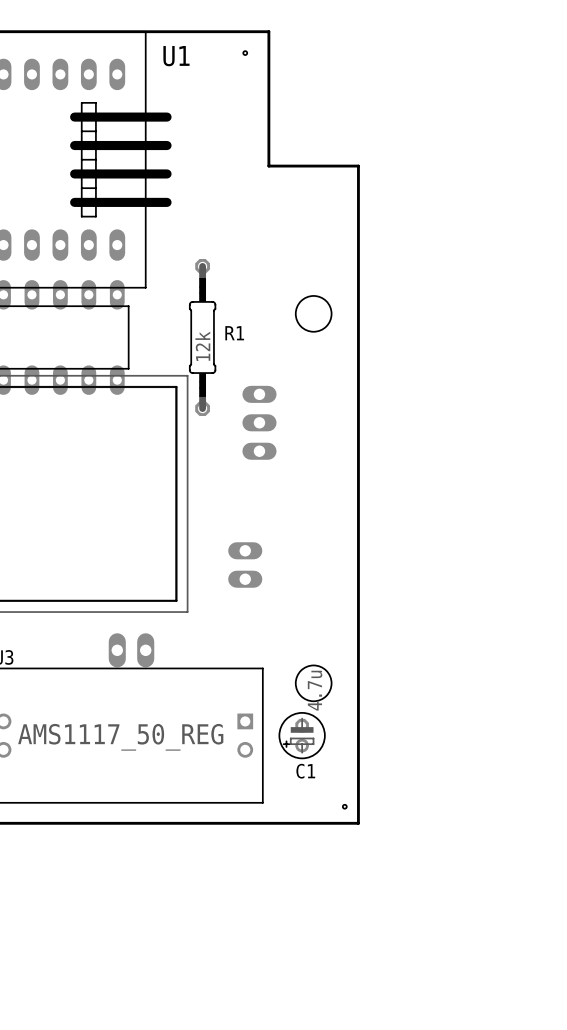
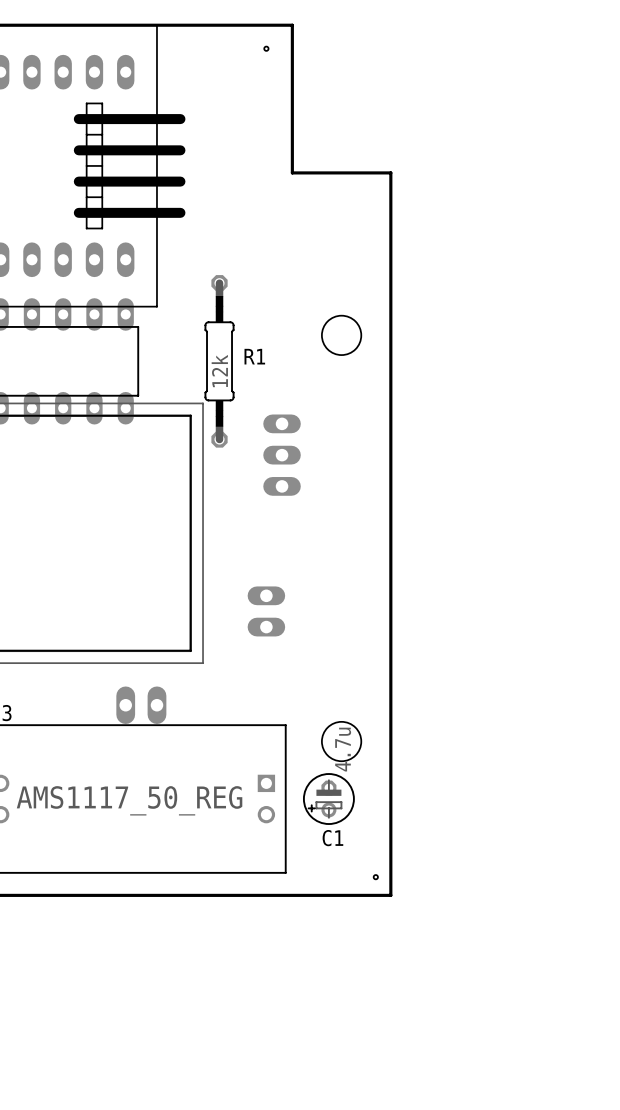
U1 name: U1 (176, 56) -> none

